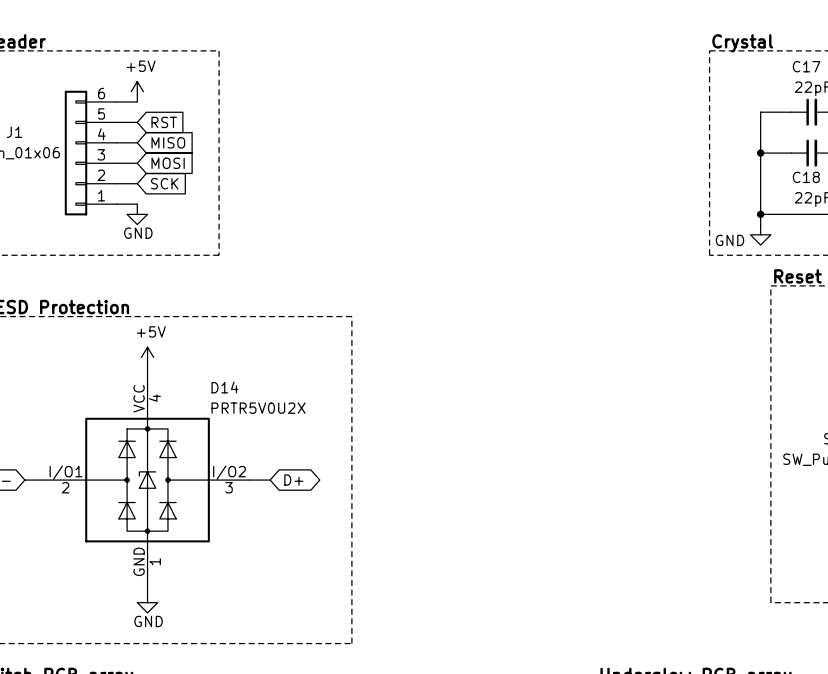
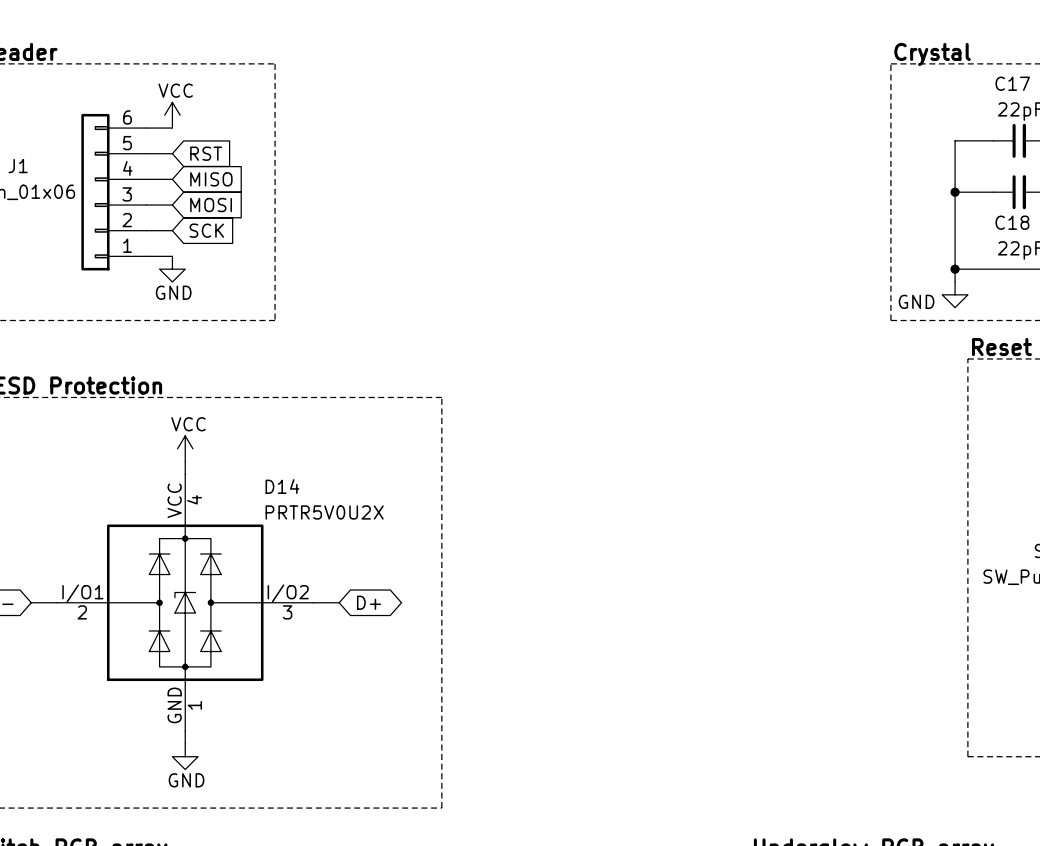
power symbol: +5V (137, 91) -> VCC (172, 115)
power symbol: +5V (147, 357) -> VCC (185, 448)

